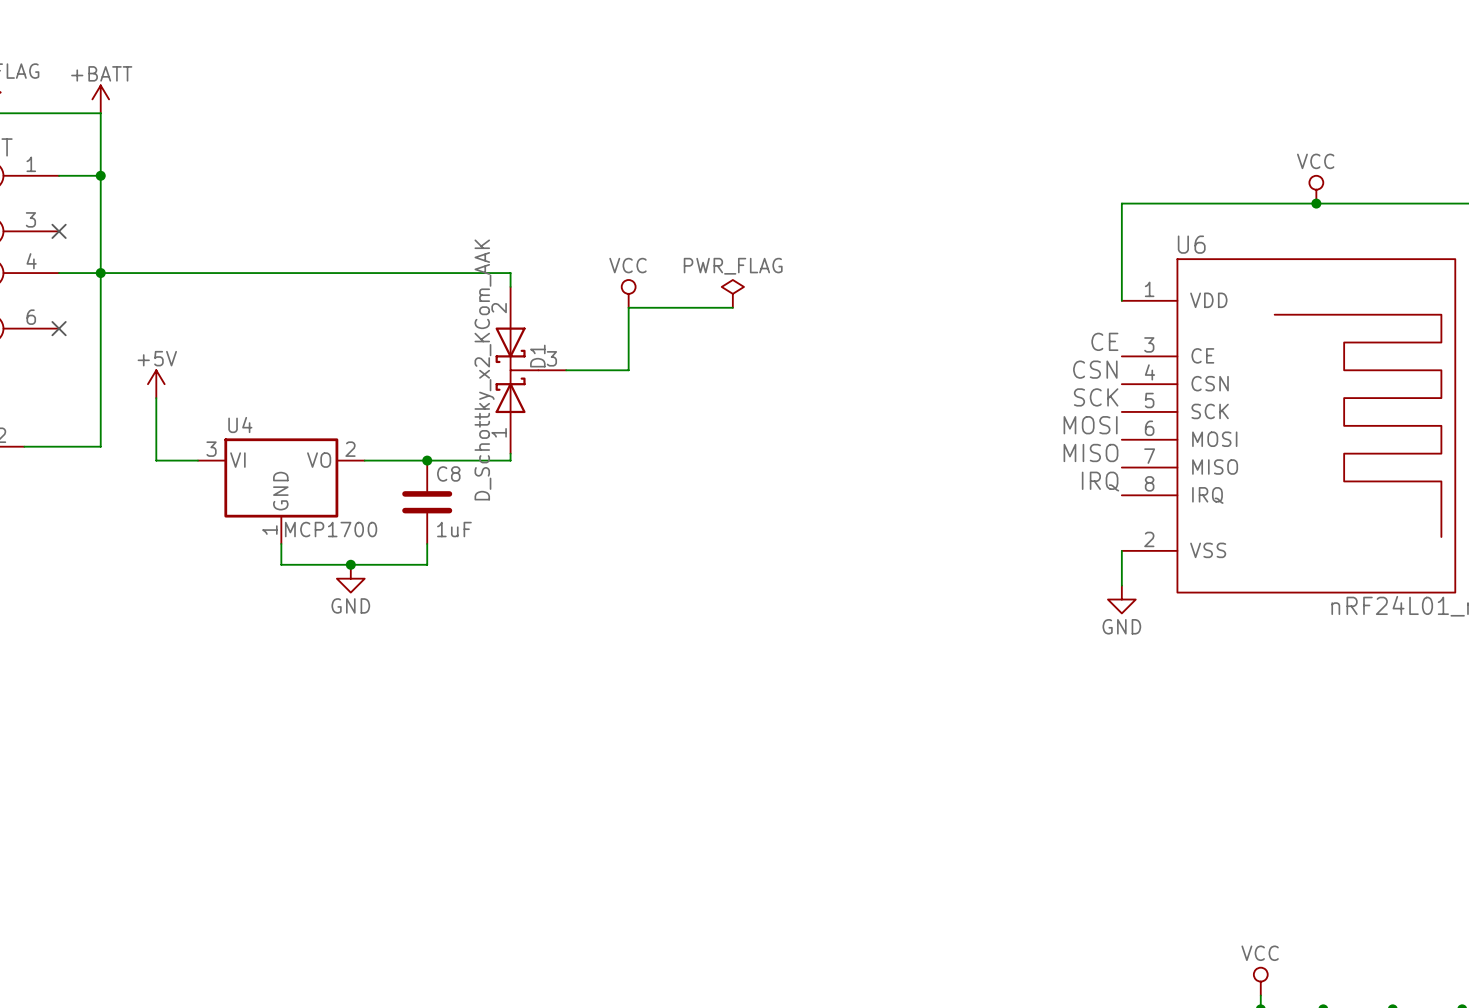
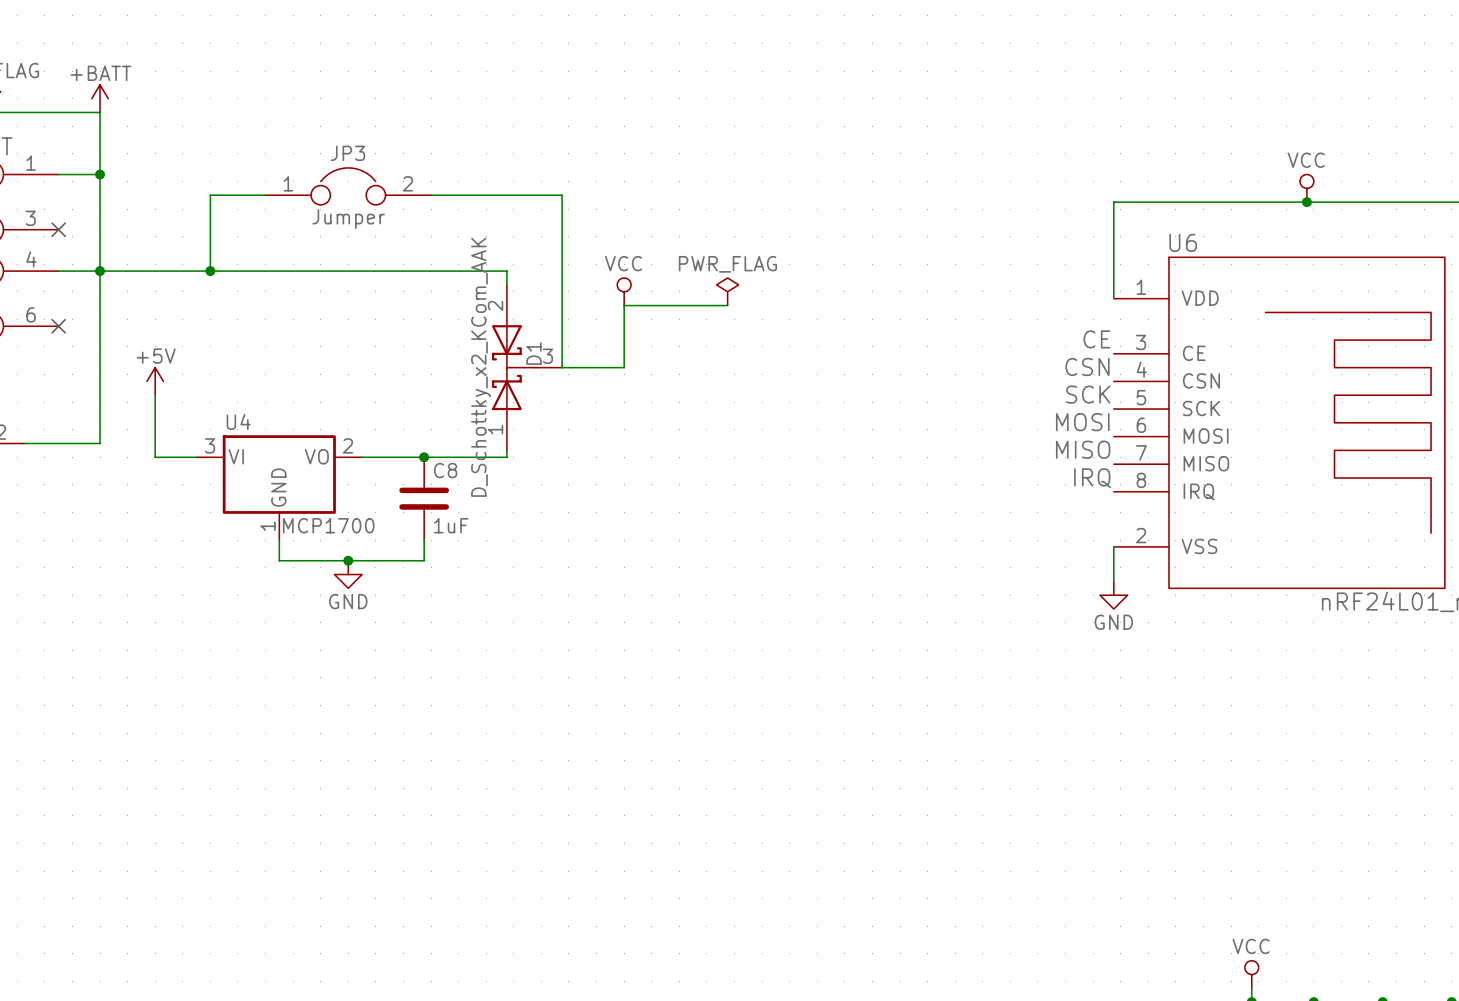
JP3: none -> Jumper (348, 186)
wire: none -> (265, 195) (210, 195) (210, 271)
wire: none -> (431, 195) (562, 195) (562, 367)
junction: none -> (210, 271)

